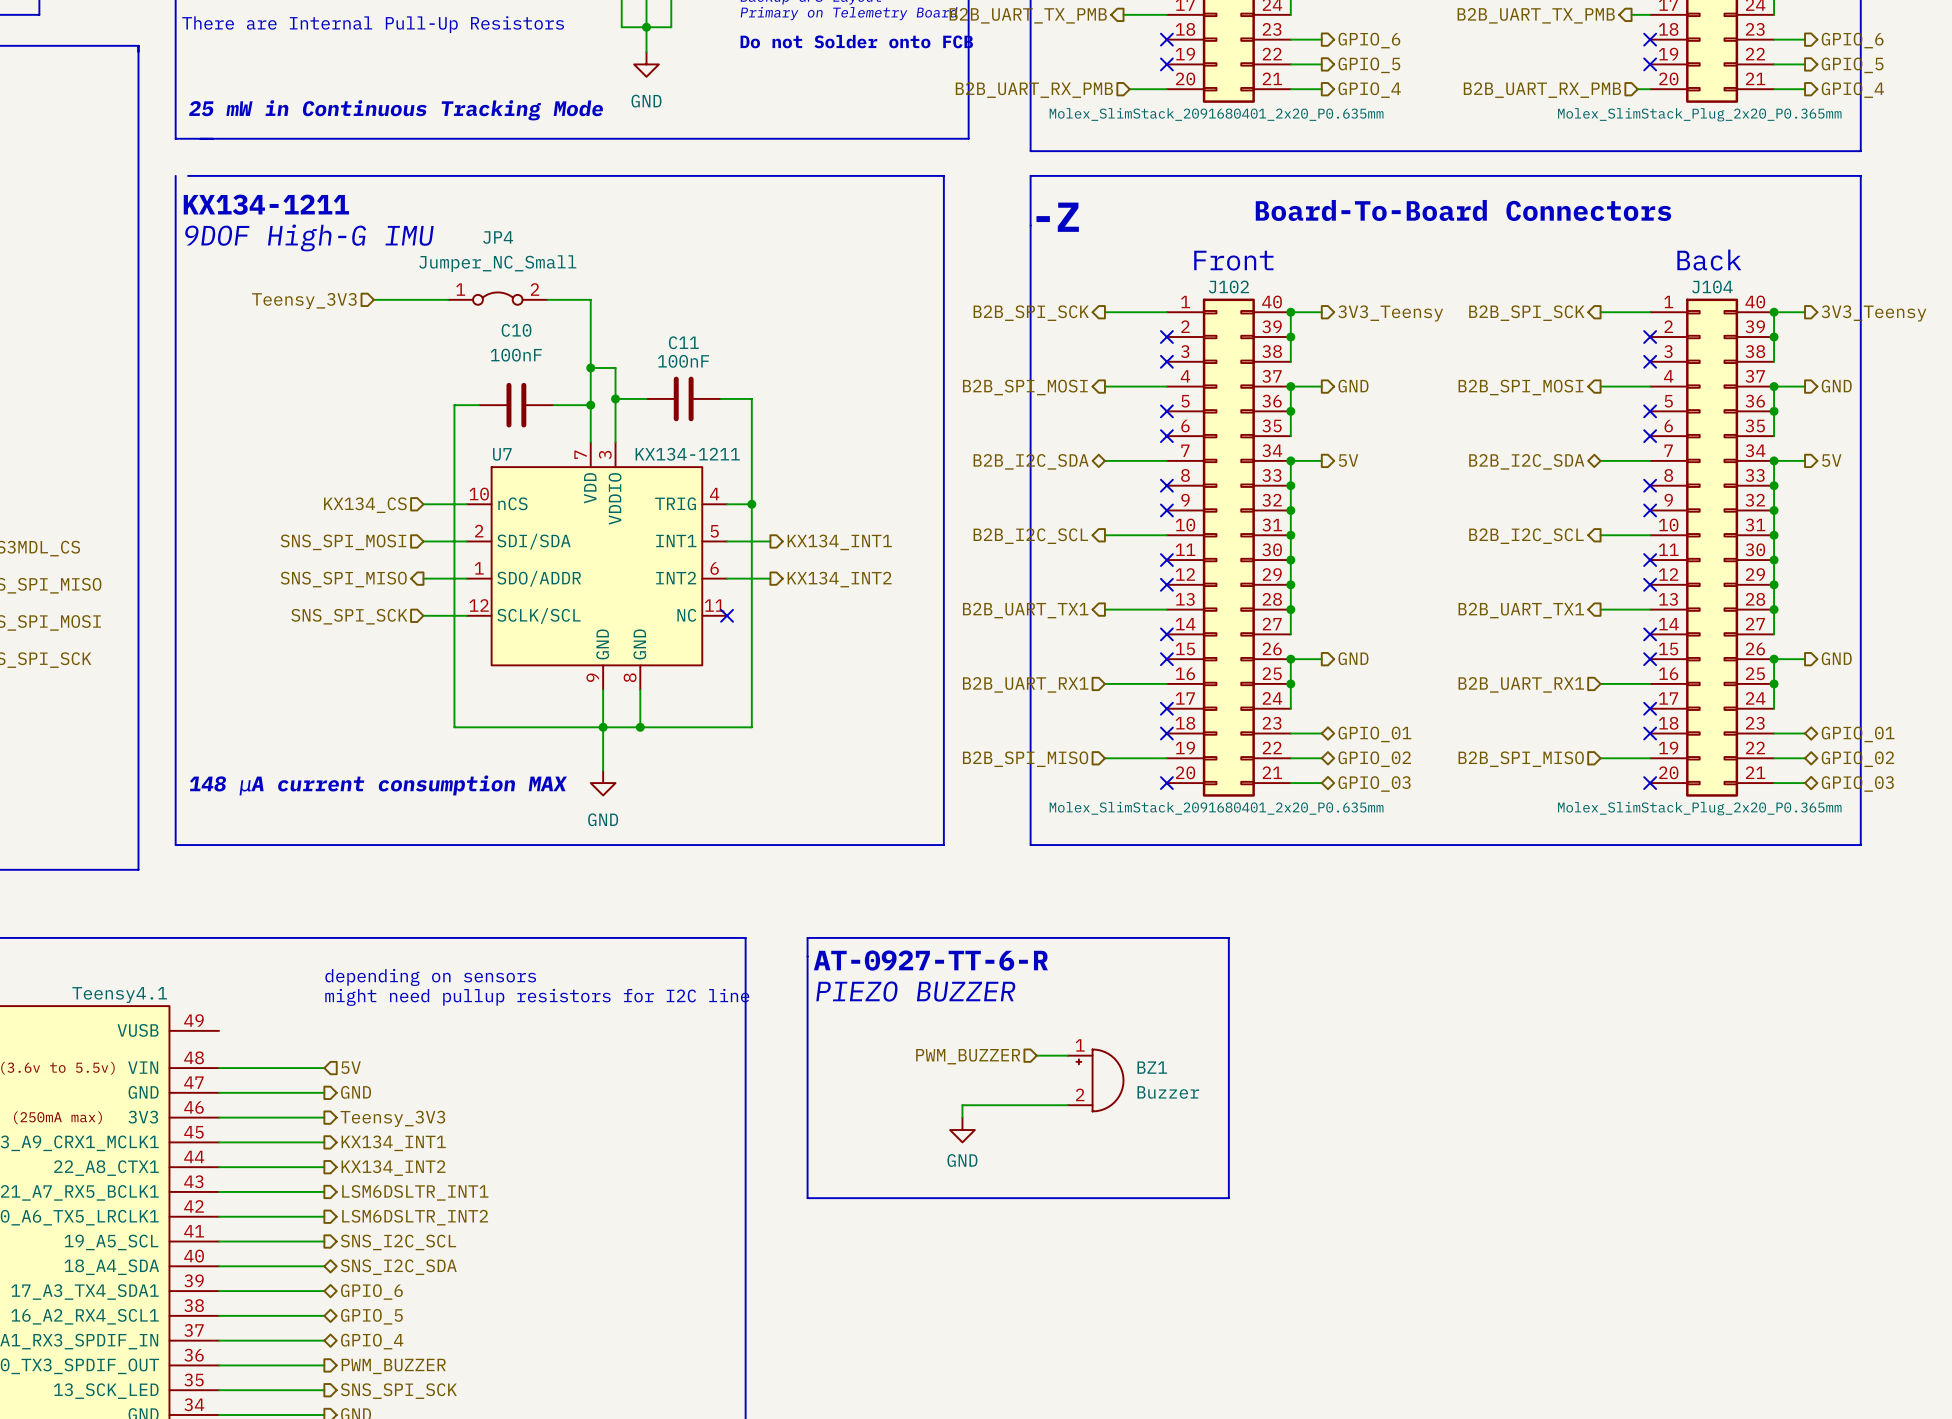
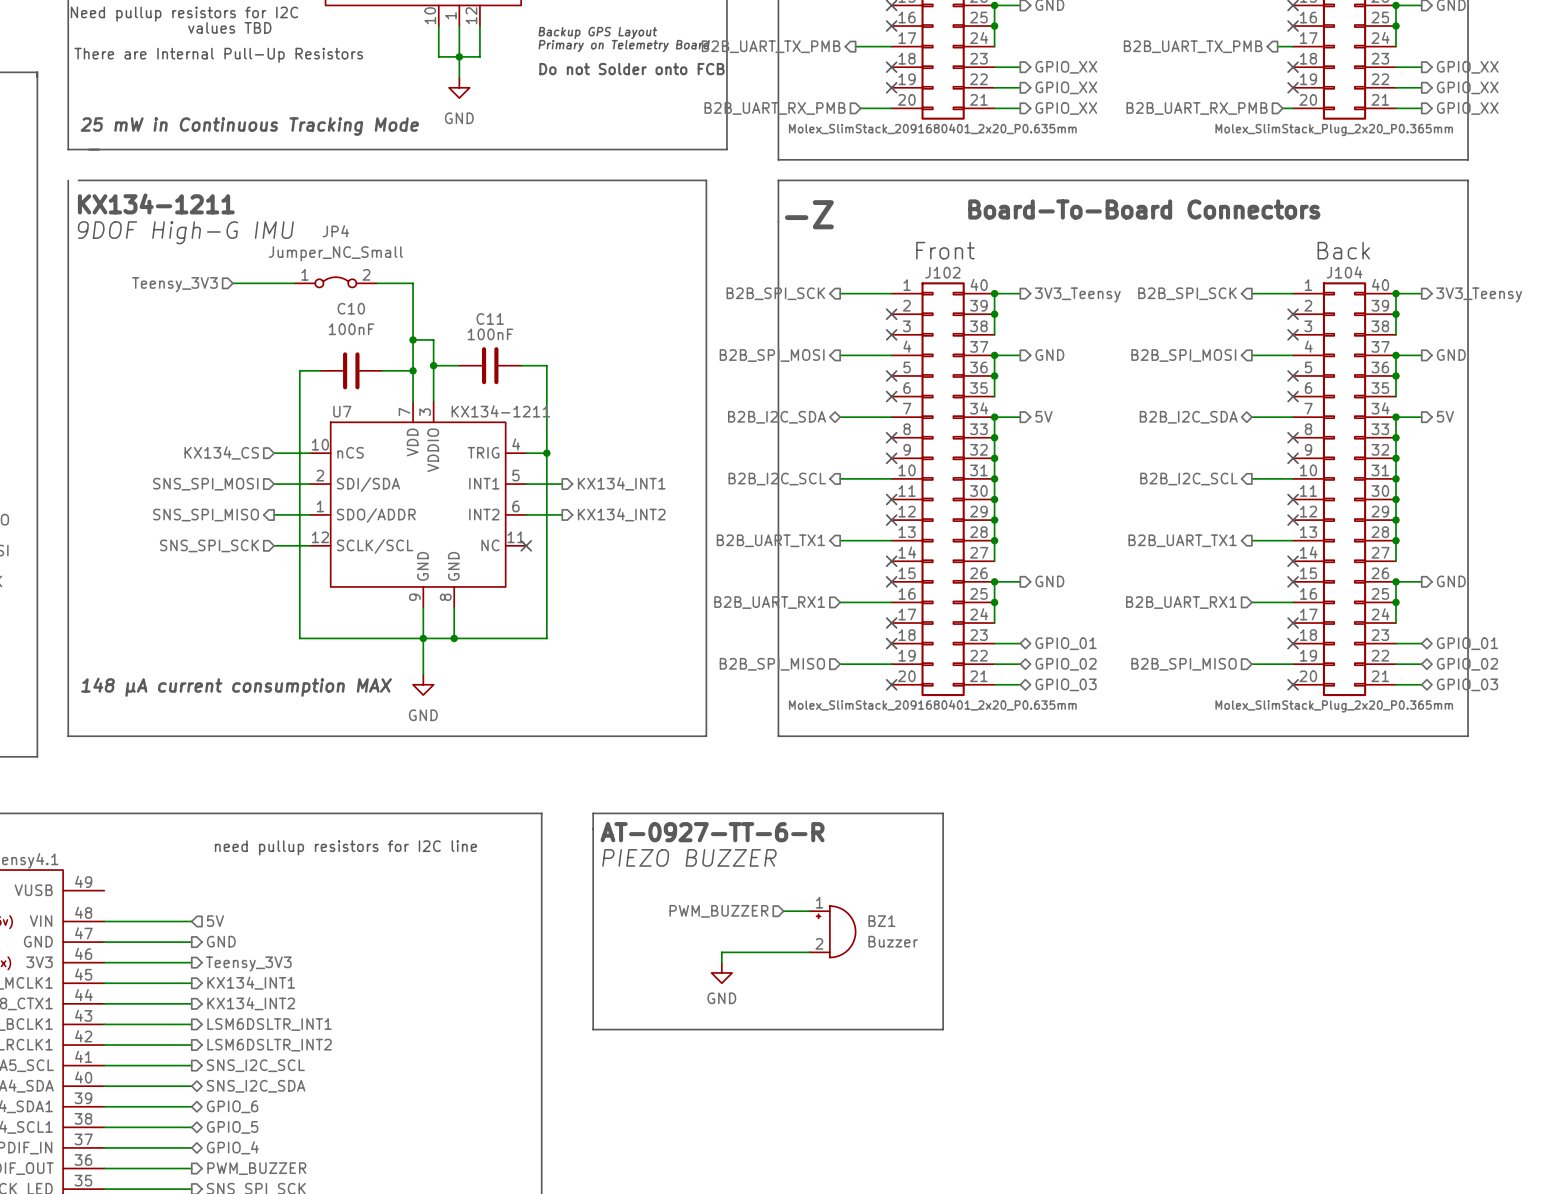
hierarchical label: GPIO_6 (1369, 40) -> GPIO_XX (1066, 67)
hierarchical label: GPIO_6 (1852, 40) -> GPIO_XX (1467, 67)
hierarchical label: GPIO_5 (1369, 65) -> GPIO_XX (1066, 87)
hierarchical label: GPIO_5 (1852, 65) -> GPIO_XX (1467, 87)
hierarchical label: GPIO_4 (1369, 90) -> GPIO_XX (1066, 108)
hierarchical label: GPIO_4 (1852, 90) -> GPIO_XX (1467, 108)
text: depending on sensors (430, 977) -> none
text: might need pullup resistors for I2C line (537, 997) -> need pullup resistors for I2C line (345, 847)

